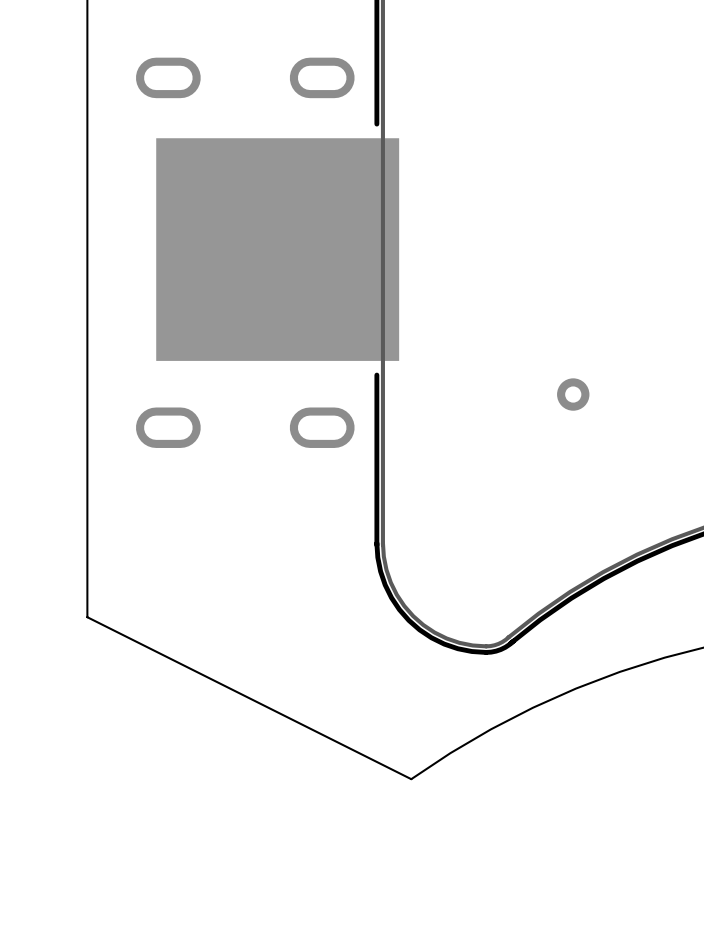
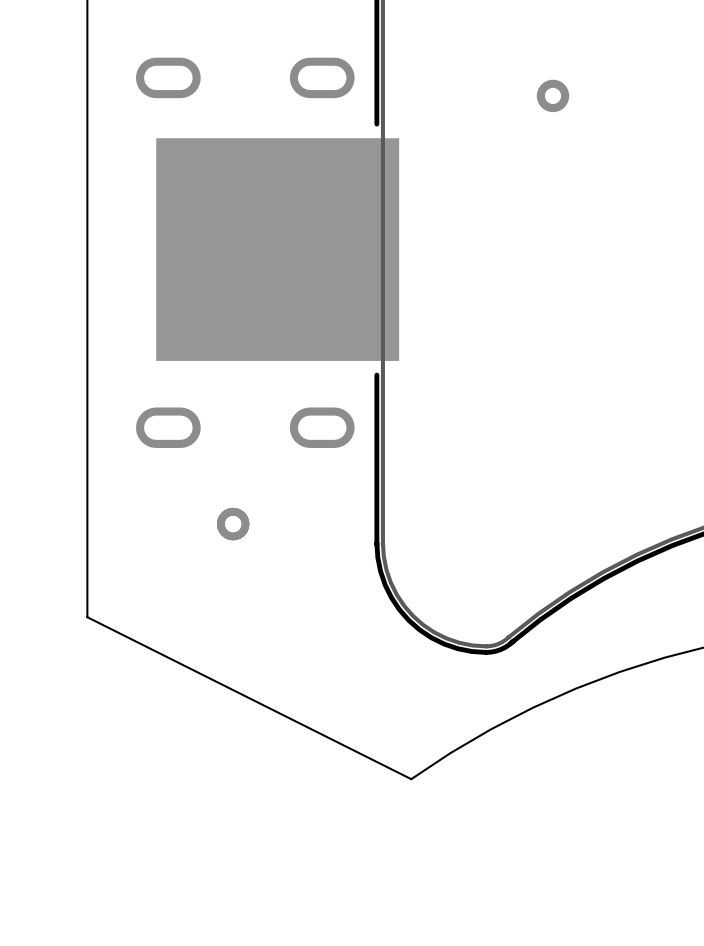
via: none -> (553, 95)
via: (573, 394) -> none
via: none -> (233, 524)

